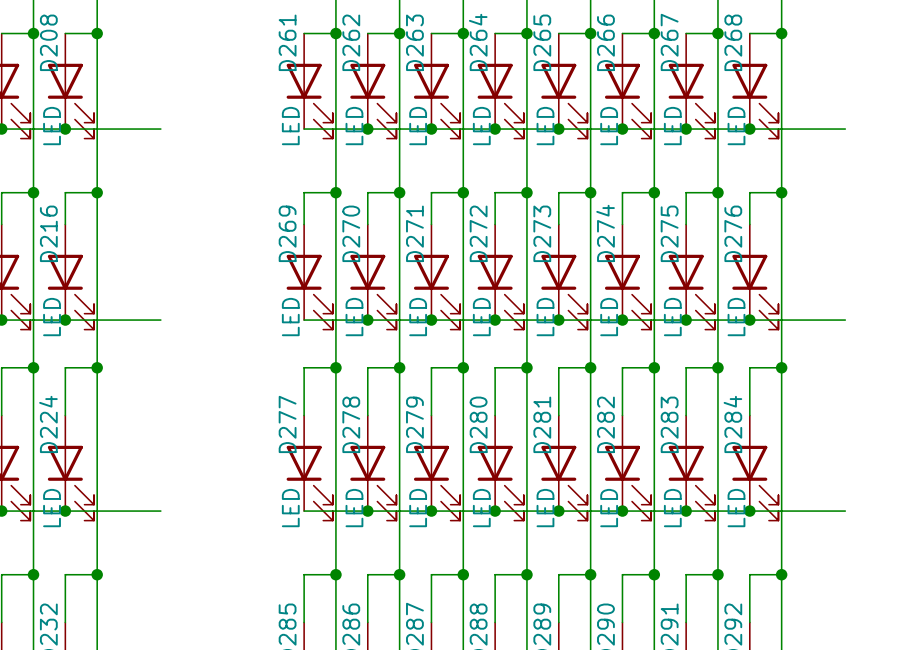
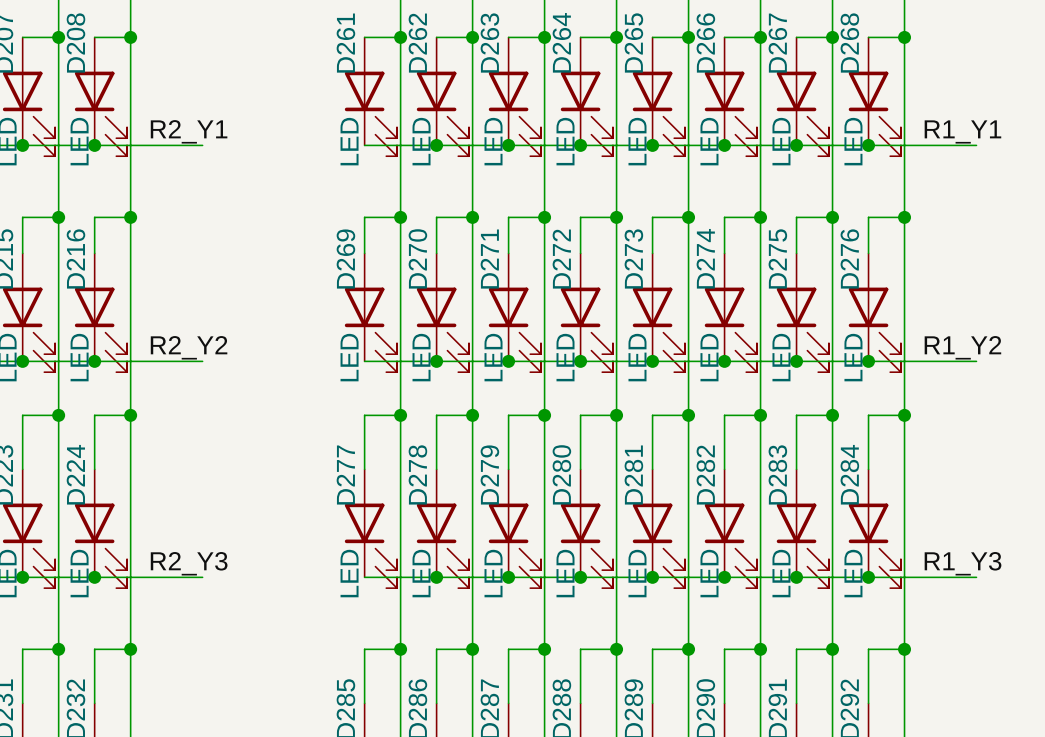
label: none -> R2_Y1 (189, 131)
label: none -> R1_Y1 (962, 131)
label: none -> R2_Y2 (189, 347)
label: none -> R1_Y2 (962, 347)
label: none -> R2_Y3 (189, 563)
label: none -> R1_Y3 (963, 563)

